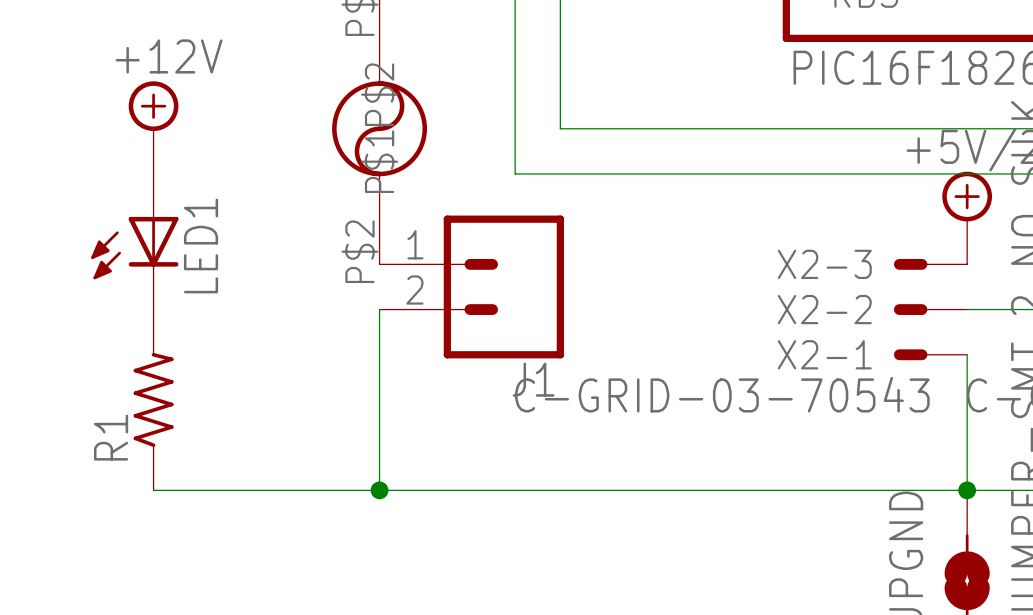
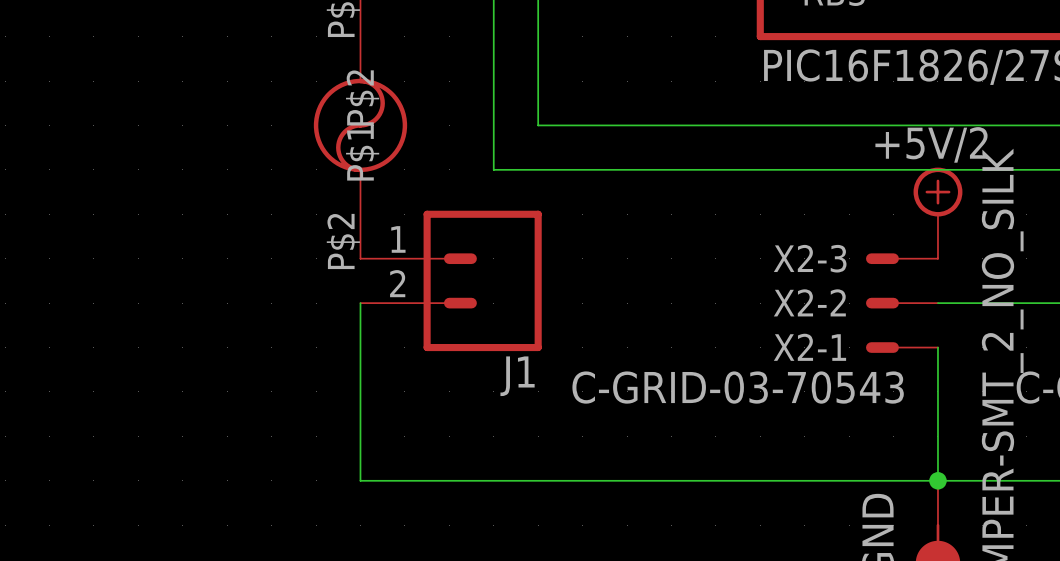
power symbol: +12V (153, 127) -> none
LED1: (134, 241) -> none
R1: (153, 399) -> none
wire: (153, 490) (379, 490) -> none
junction: (379, 490) -> none

